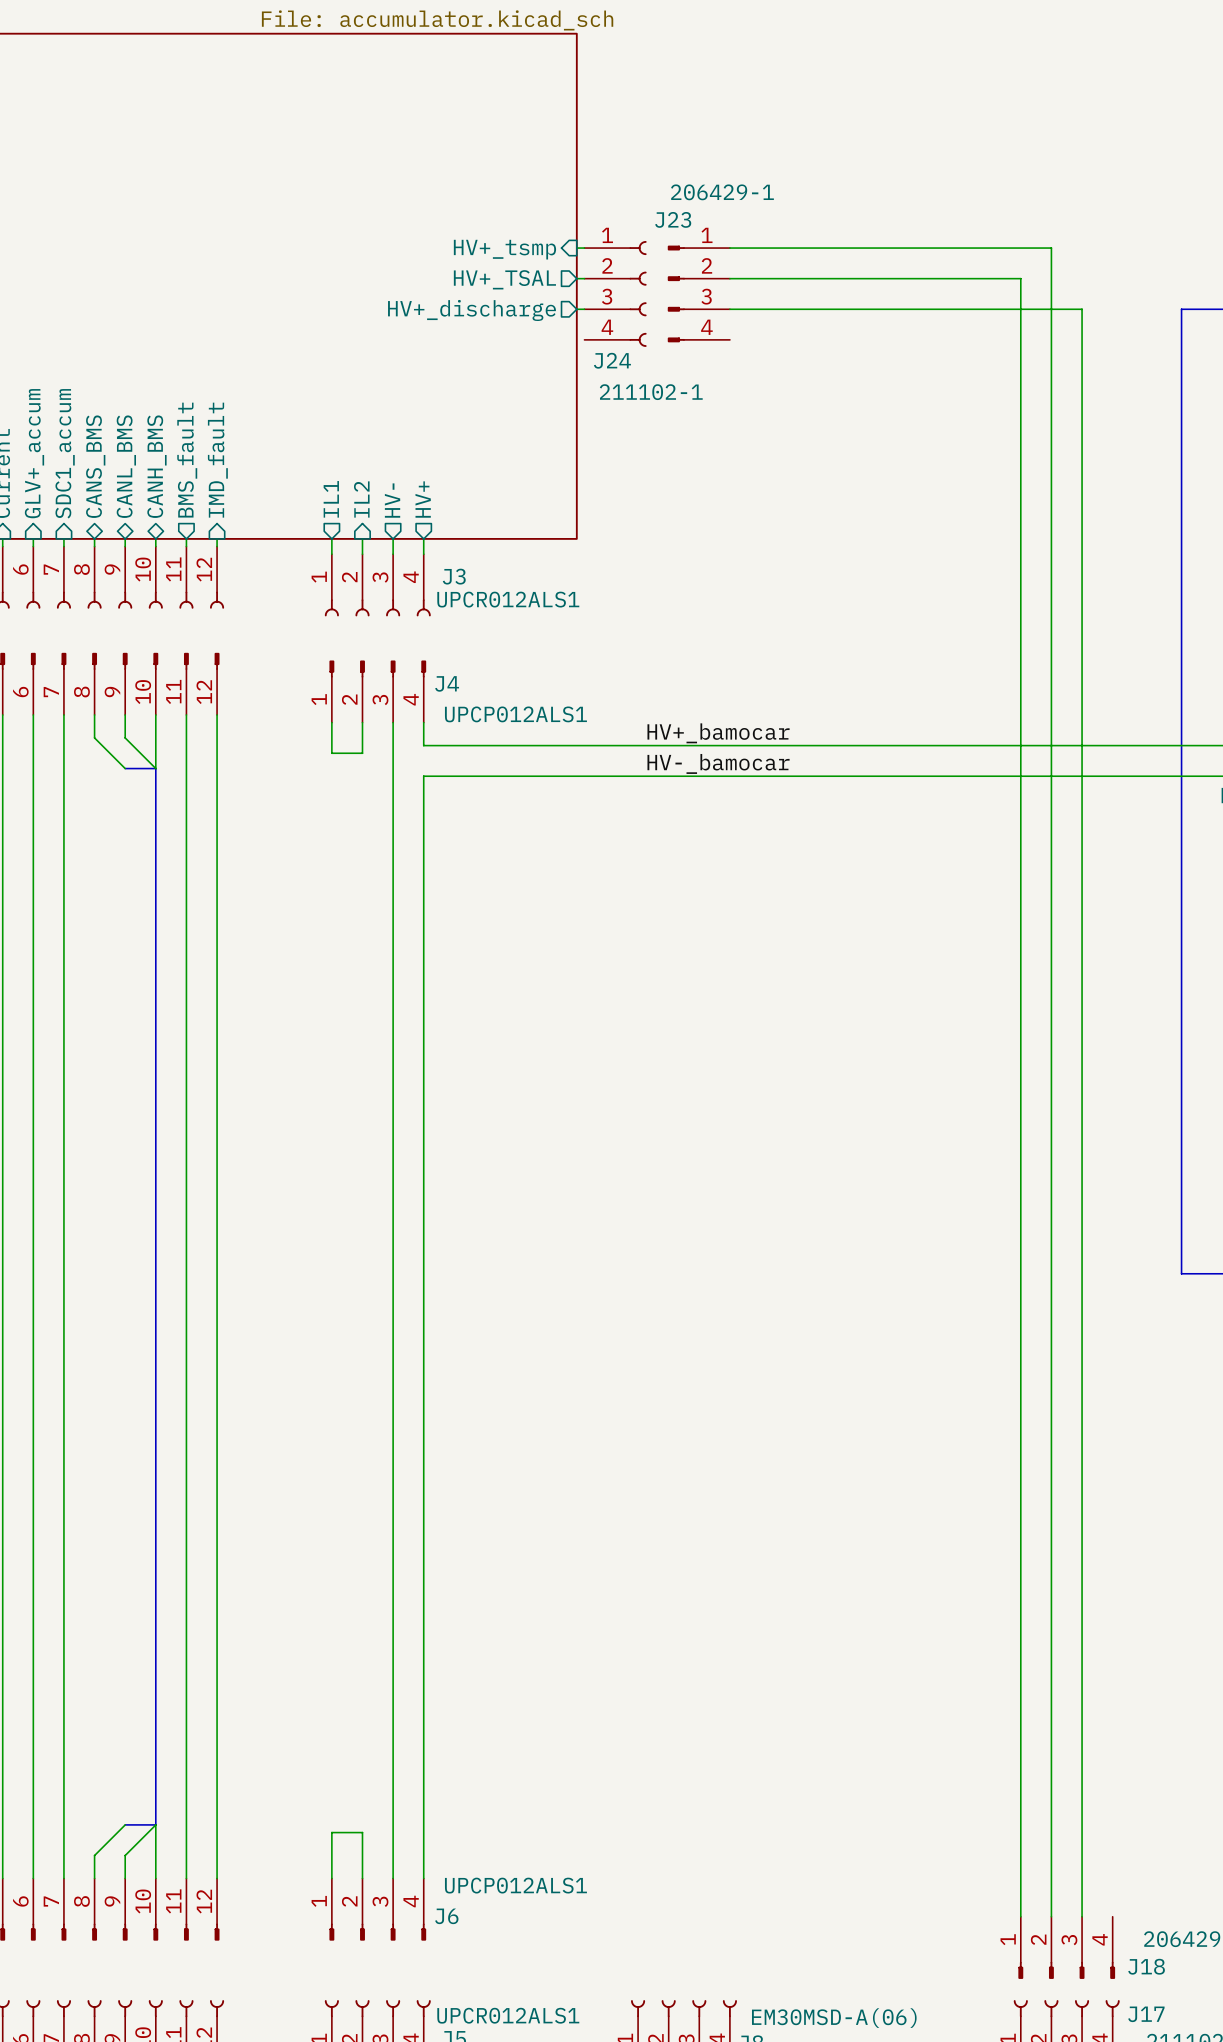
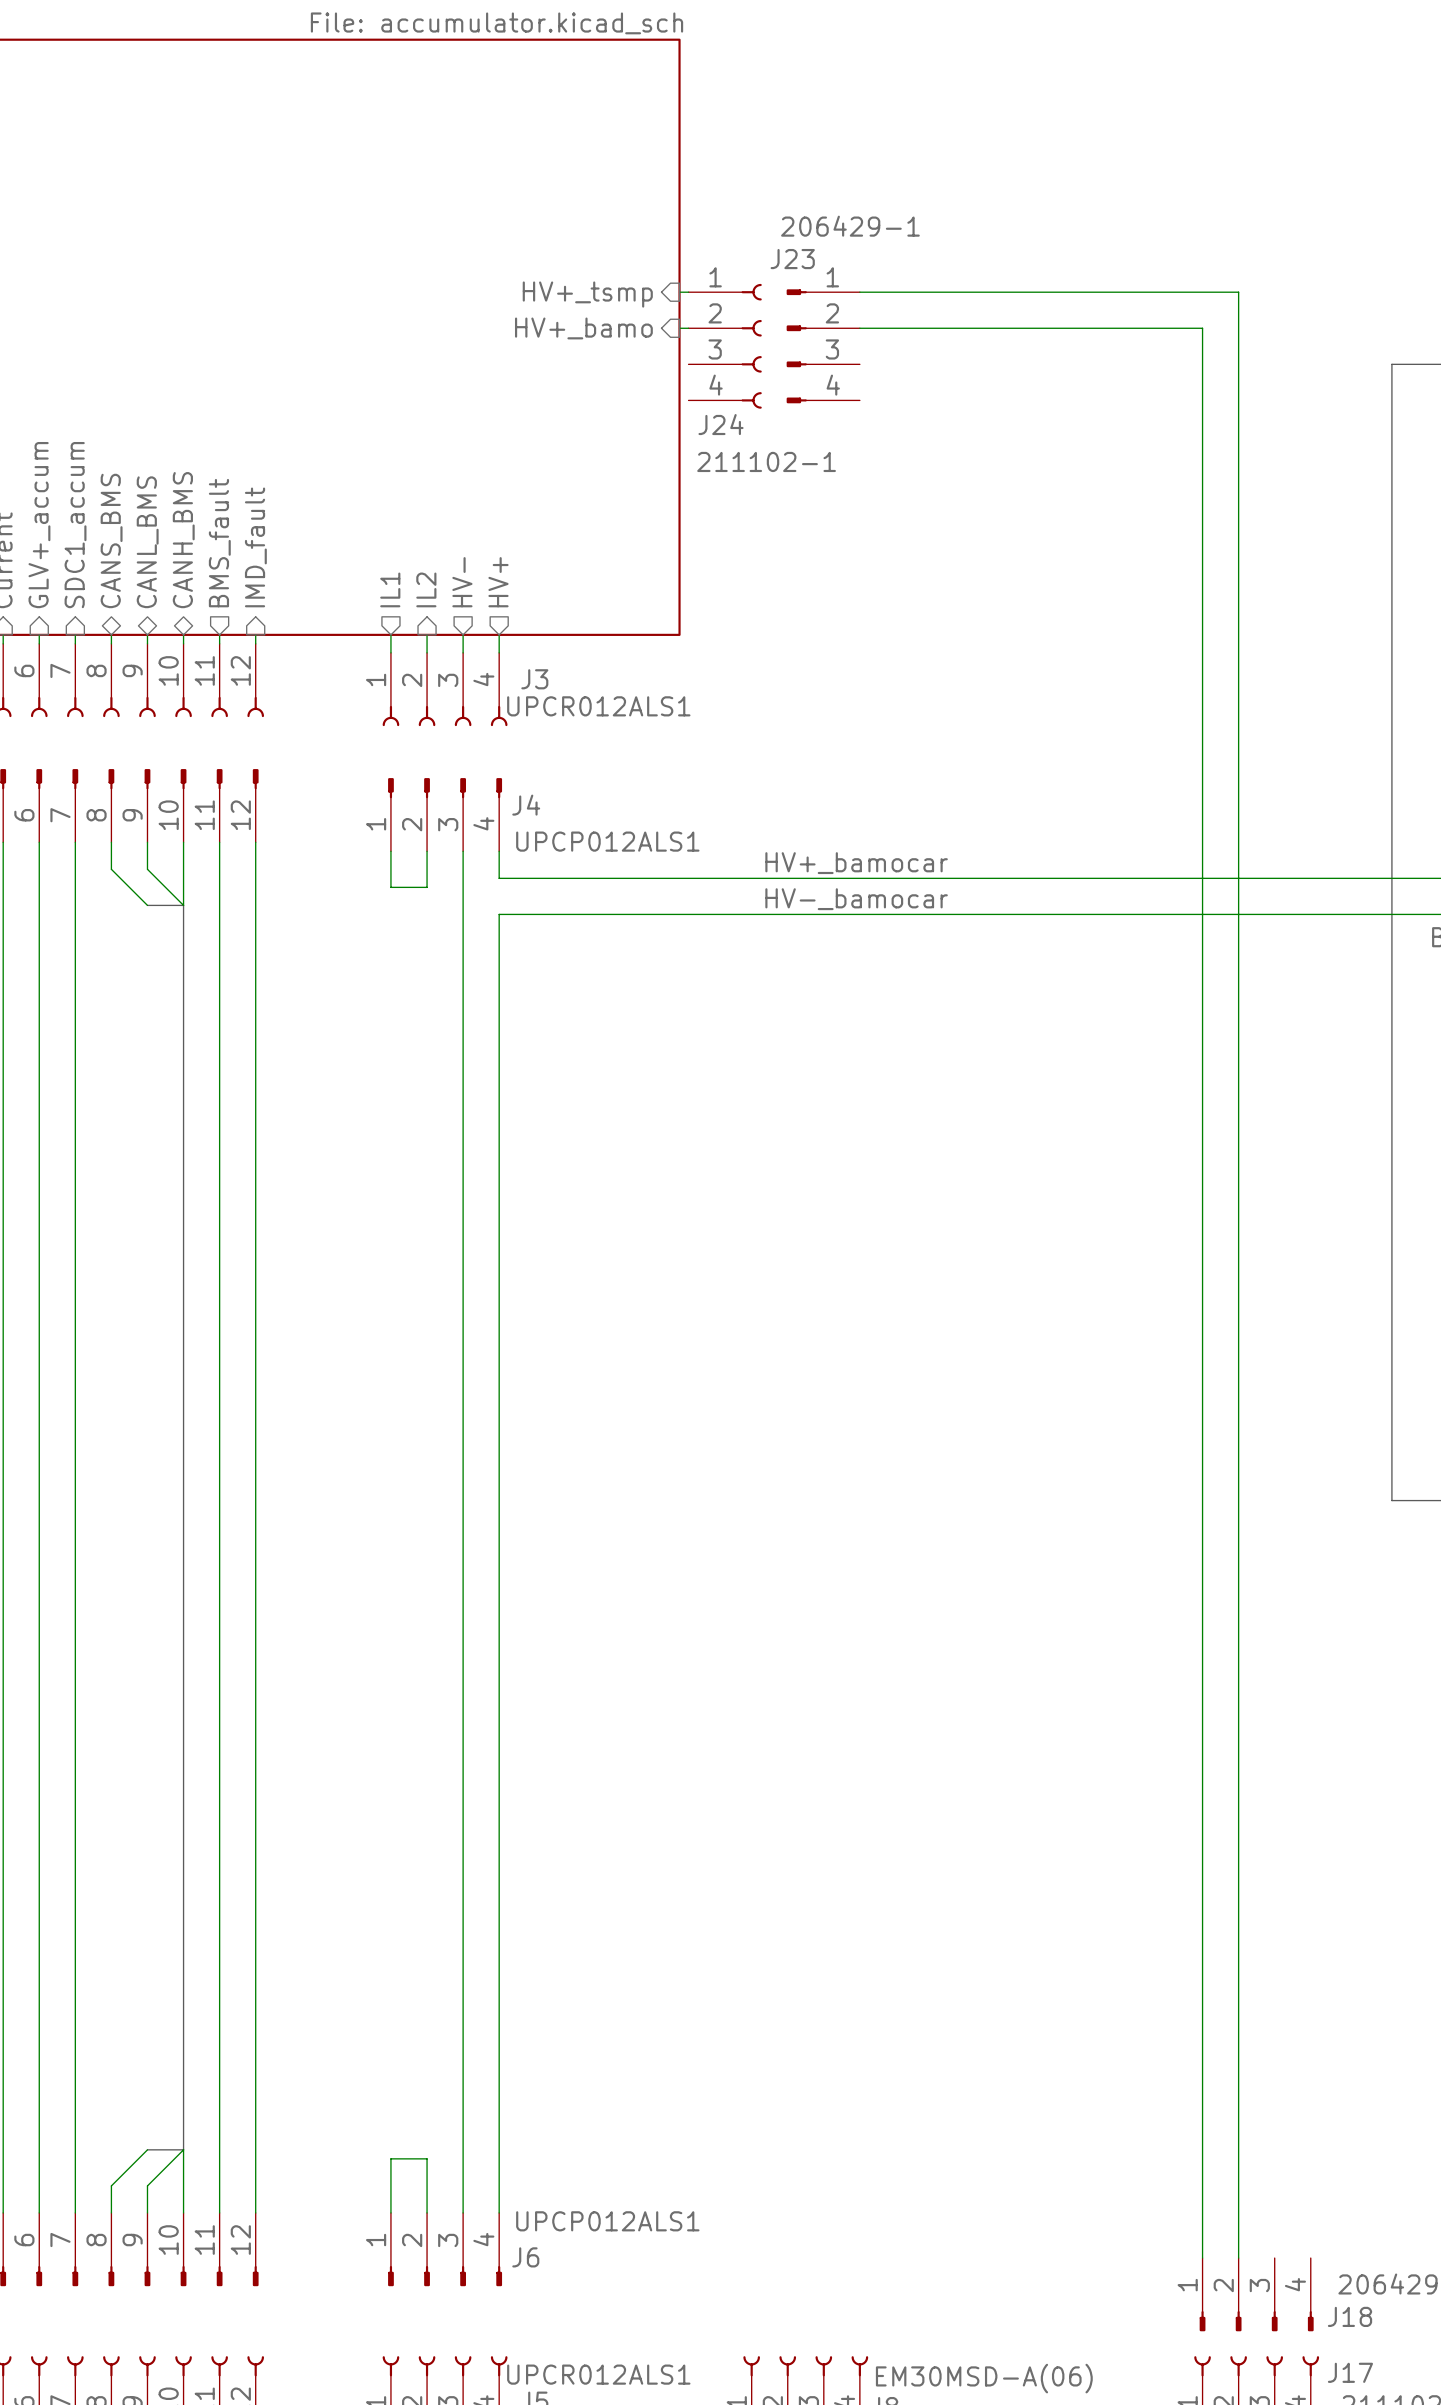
sheet pin shape: output (504, 279) -> input (583, 328)
sheet pin: HV+_TSAL (504, 279) -> HV+_bamo (583, 328)
wire: (576, 309) (584, 309) -> none
wire: (729, 309) (1082, 309) (1082, 1916) -> none
sheet pin: HV+_discharge (471, 310) -> none

